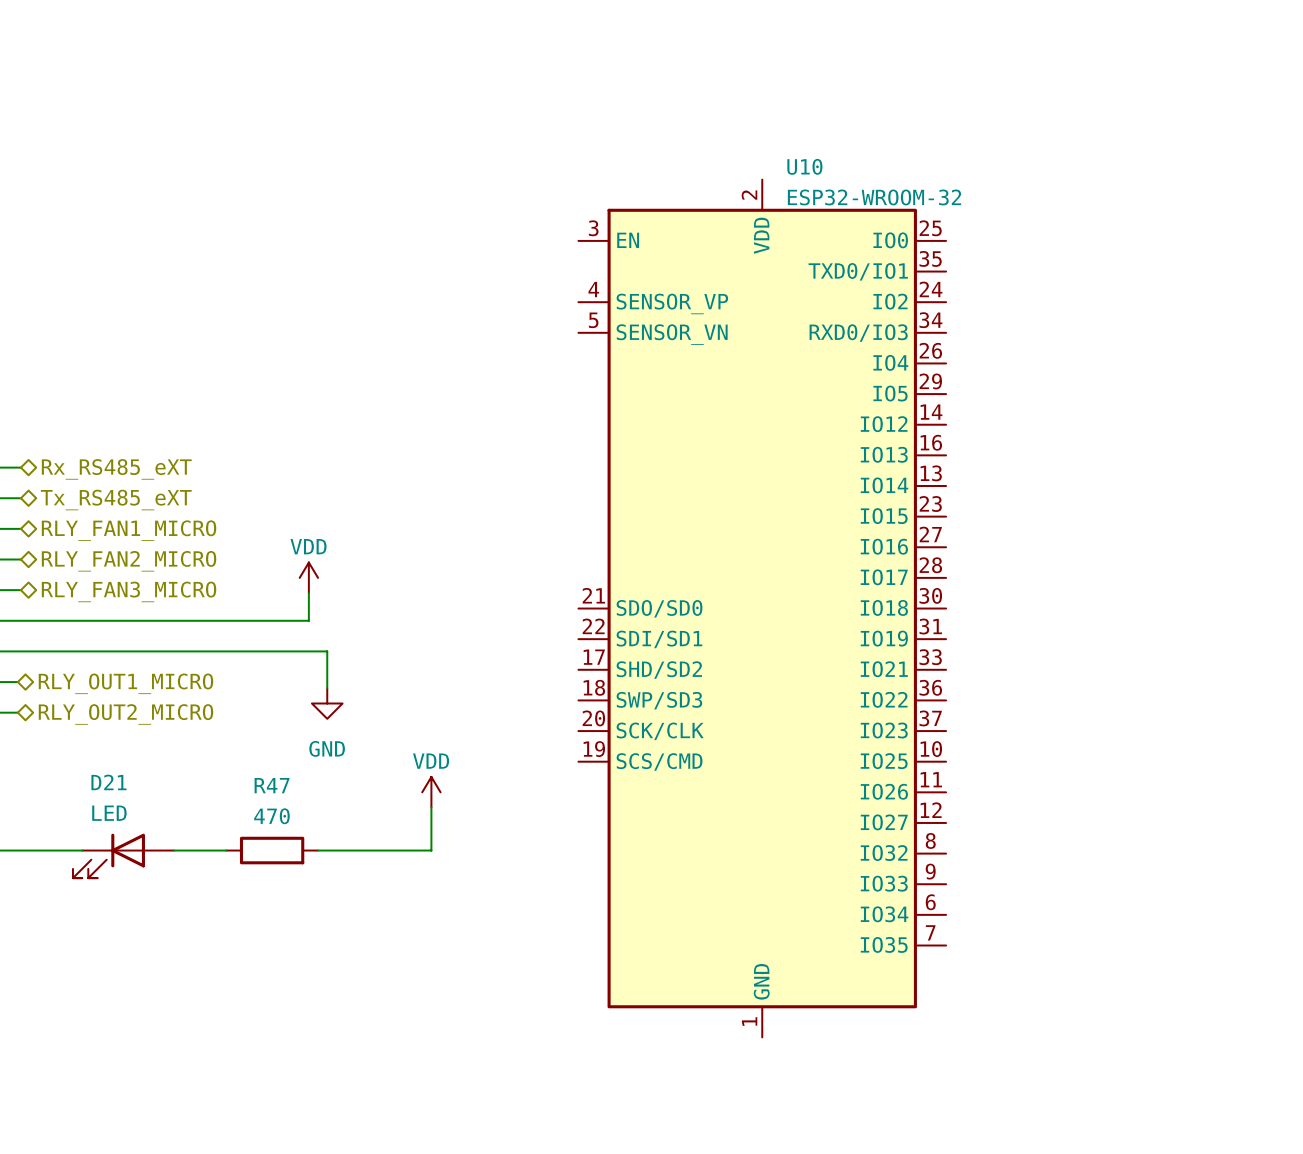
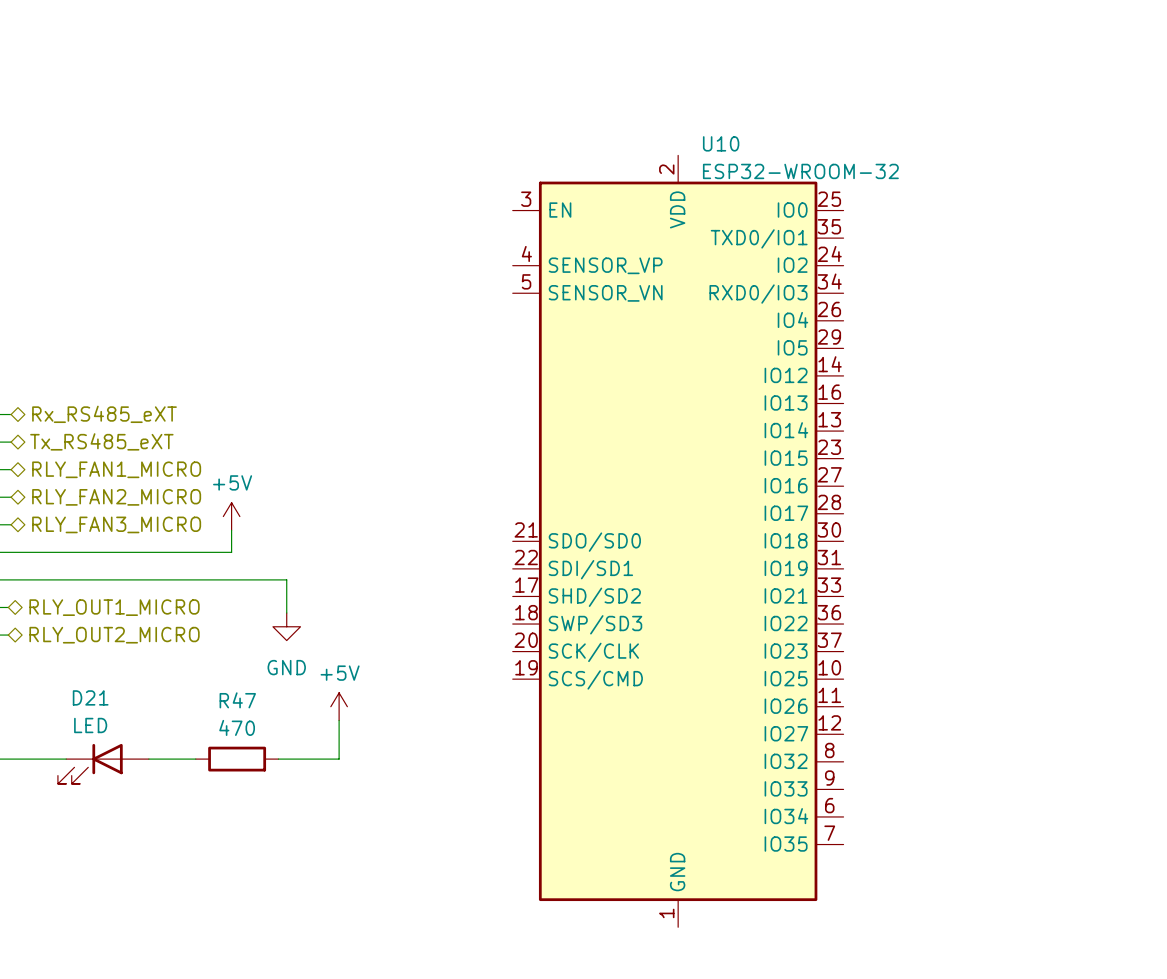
power symbol: VDD (308, 577) -> none
power symbol: none -> +5V (231, 516)
wire: (308, 593) (308, 620) (265, 620) -> (231, 530) (231, 552)
power symbol: none -> +5V (339, 706)
power symbol: VDD (431, 792) -> none
wire: (431, 807) (431, 850) (385, 850) -> (339, 720) (339, 759)

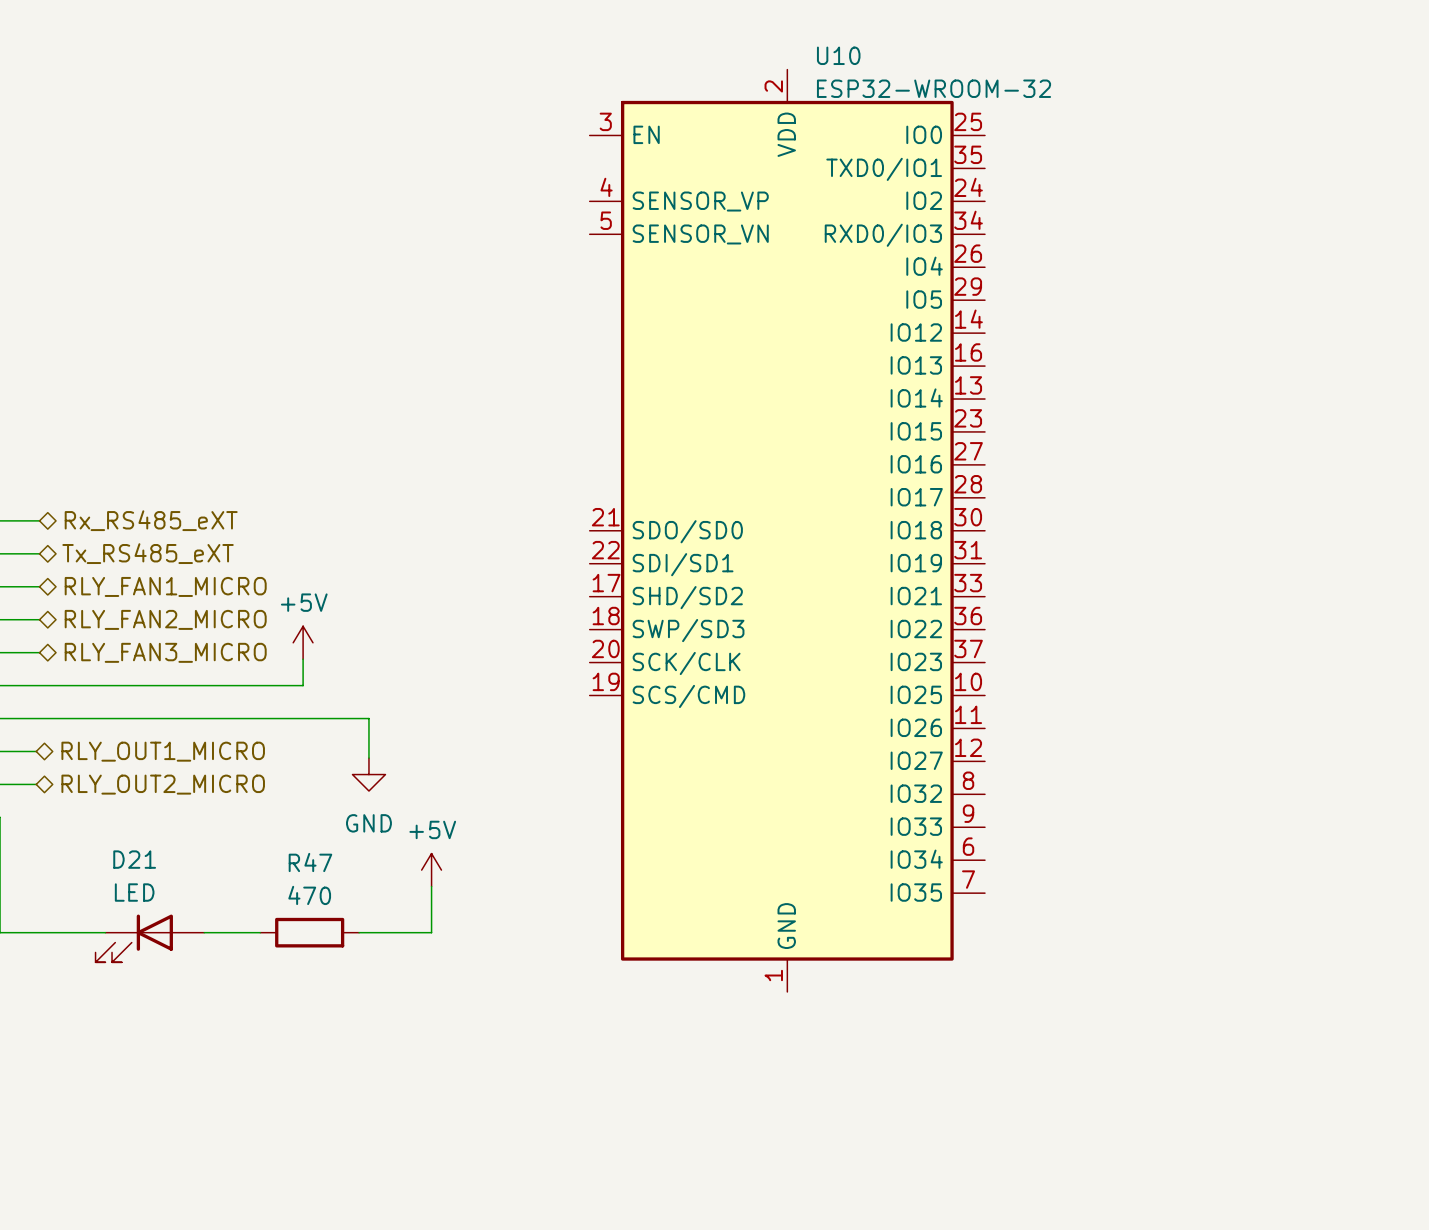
U10 position: (678, 541) -> (787, 530)

